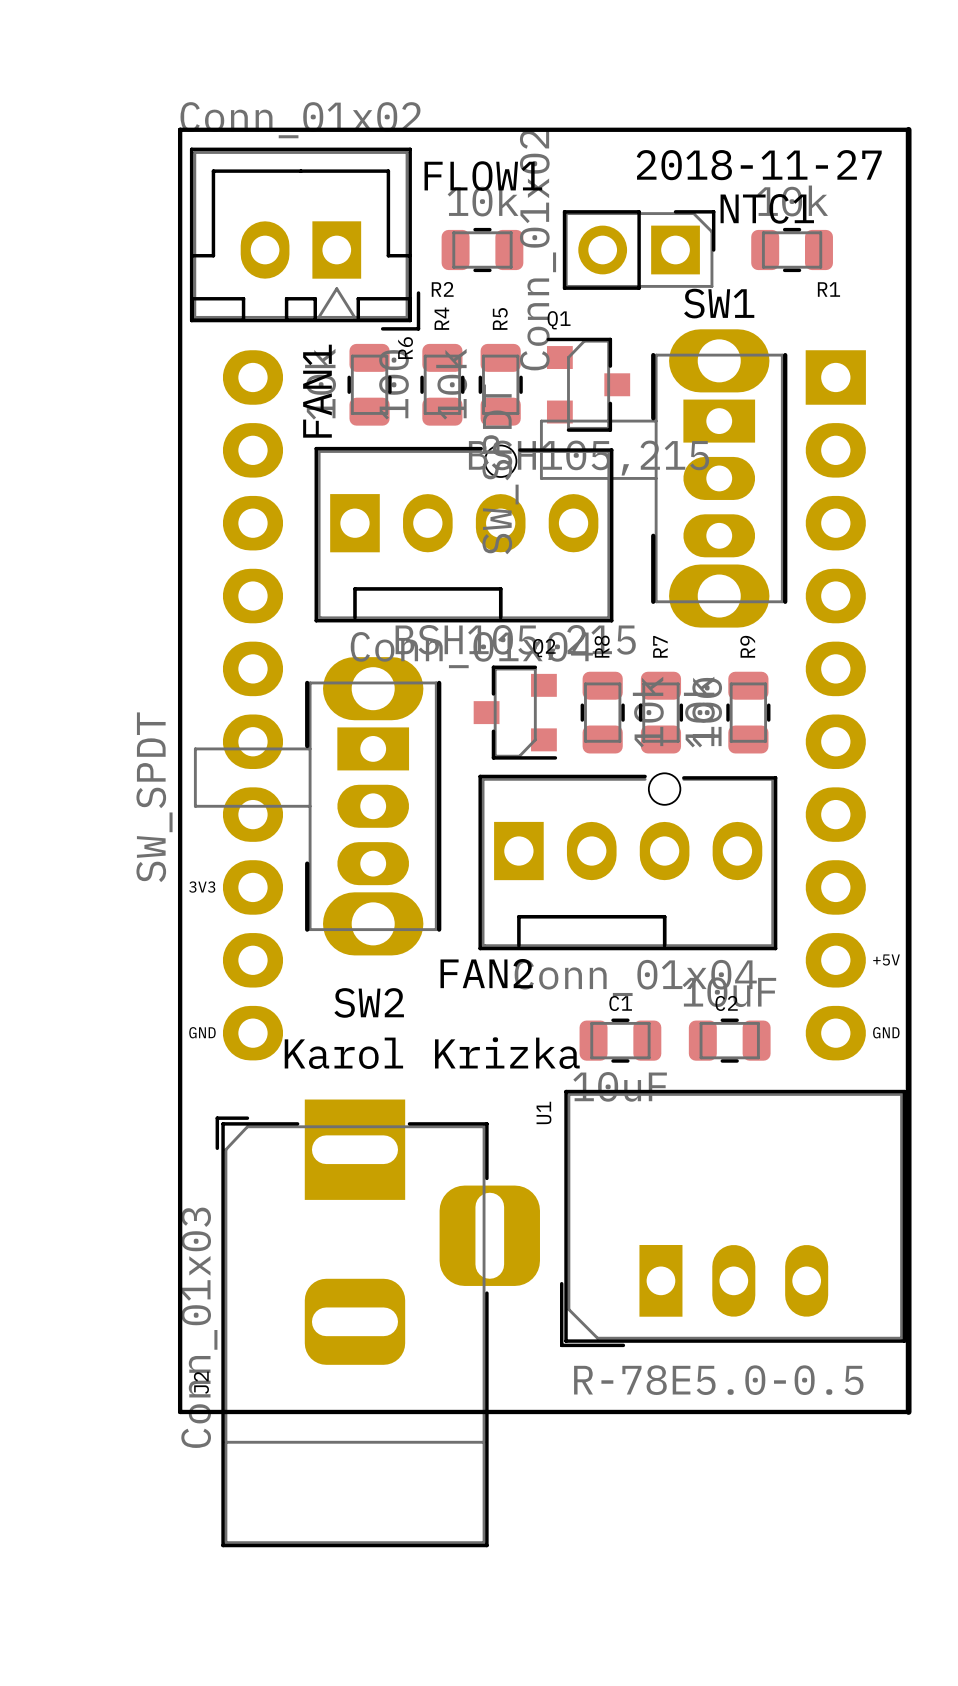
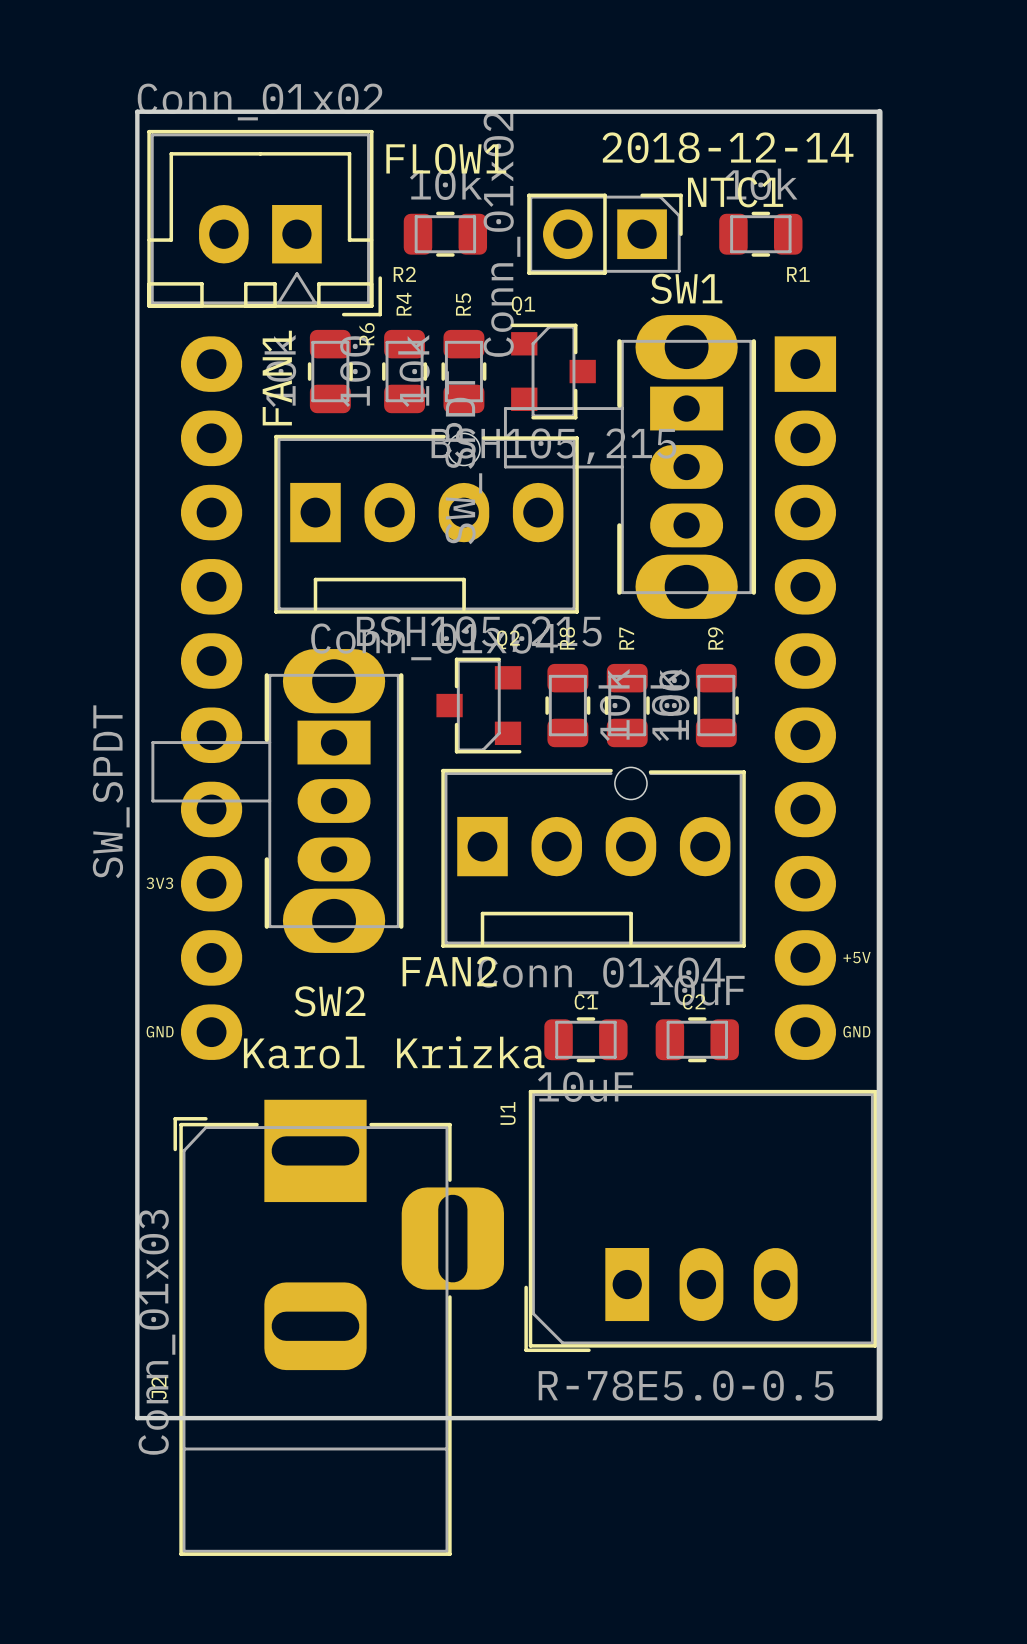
text: 2018-11-27 (759, 165) -> 2018-12-14 (728, 147)

